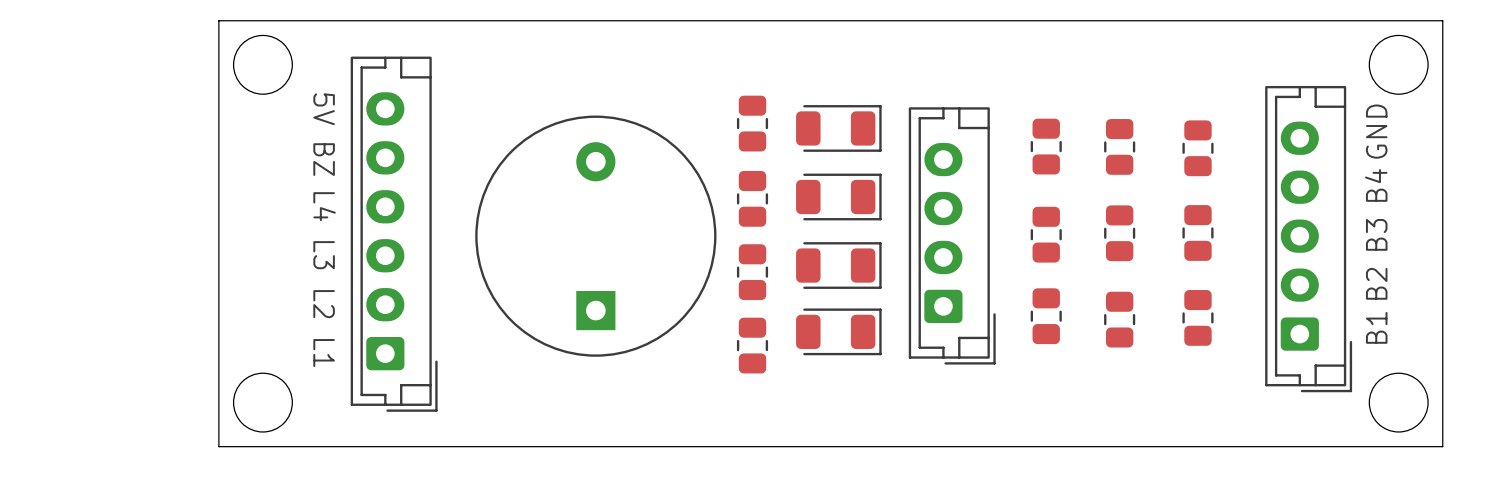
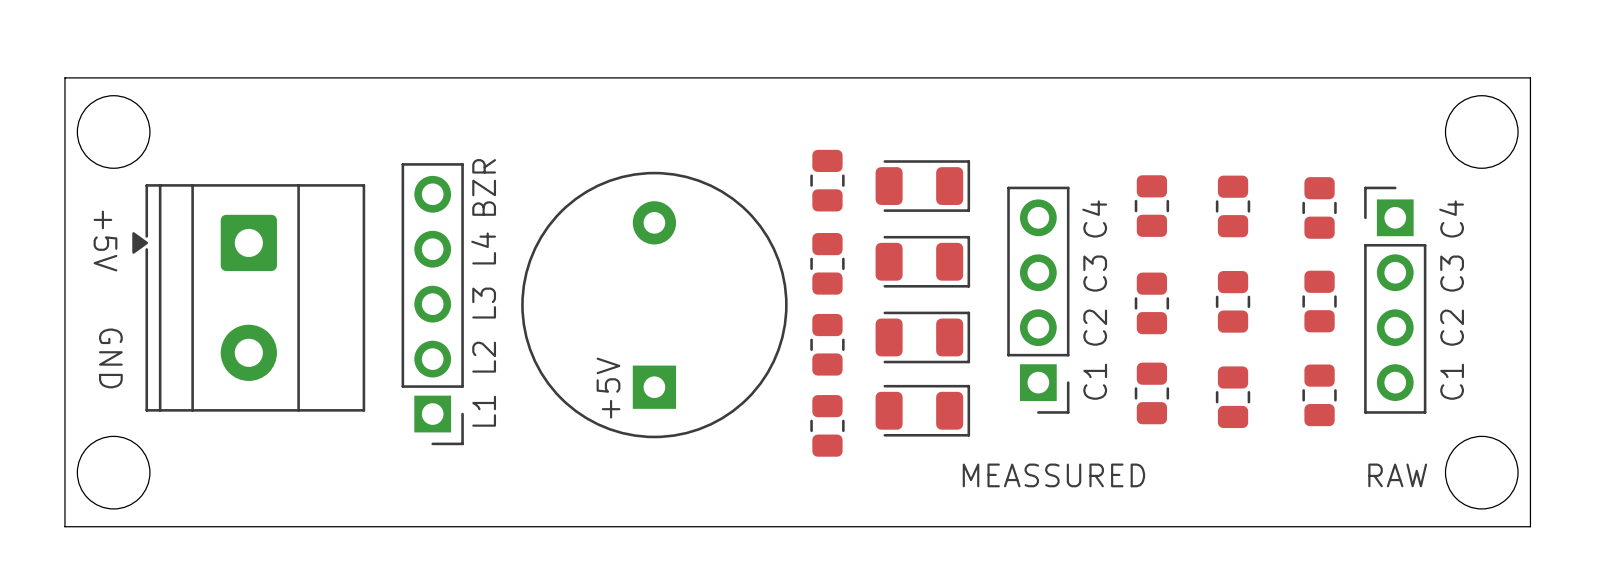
board edge: (218, 20) (1442, 20) (1442, 446) (218, 446) (218, 20) -> (64, 77) (64, 526) (1530, 526) (1530, 77) (64, 77)
round board edge: [233, 34, 293, 95] -> none
round board edge: [1368, 34, 1429, 95] -> none
round board edge: none -> [76, 95, 151, 169]
round board edge: none -> [1444, 95, 1519, 169]
part footprint: [350, 56, 438, 412] -> [401, 163, 464, 446]
part footprint: [908, 107, 996, 365] -> [1007, 186, 1070, 414]
text: 5V (324, 109) -> none
text: none -> BZR (484, 187)
text: GND (1376, 131) -> none
text: none -> C4 (1094, 218)
text: none -> C4 (1451, 218)
text: BZ (324, 159) -> none
text: none -> +5V (105, 241)
text: B4 (1376, 185) -> none
text rotation: 0° (324, 206) -> 180° (483, 248)
text position: L4 (324, 206) -> L4 (483, 248)
text: none -> C3 (1095, 273)
text: none -> C3 (1452, 273)
part: none -> (248, 297)
part: none -> (1395, 300)
text: B3 (1376, 234) -> none
part: (1308, 239) -> none
text rotation: 0° (324, 255) -> 180° (484, 303)
text position: L3 (324, 255) -> L3 (484, 303)
text: none -> C2 (1095, 327)
text: none -> C2 (1452, 327)
text: B2 (1376, 283) -> none
text: none -> GND (110, 358)
text rotation: 0° (324, 304) -> 180° (484, 357)
text position: L2 (324, 304) -> L2 (484, 357)
text: none -> C1 (1095, 381)
text: none -> C1 (1452, 381)
text: none -> +5V (608, 388)
text: B1 (1376, 327) -> none
text rotation: 0° (324, 353) -> 180° (484, 411)
text position: L1 (324, 353) -> L1 (484, 411)
round board edge: none -> [76, 435, 151, 510]
round board edge: none -> [1444, 435, 1519, 510]
round board edge: [233, 372, 293, 433] -> none
round board edge: [1368, 372, 1429, 433] -> none
text: none -> MEASSURED (1053, 475)
text: none -> RAW (1397, 475)

